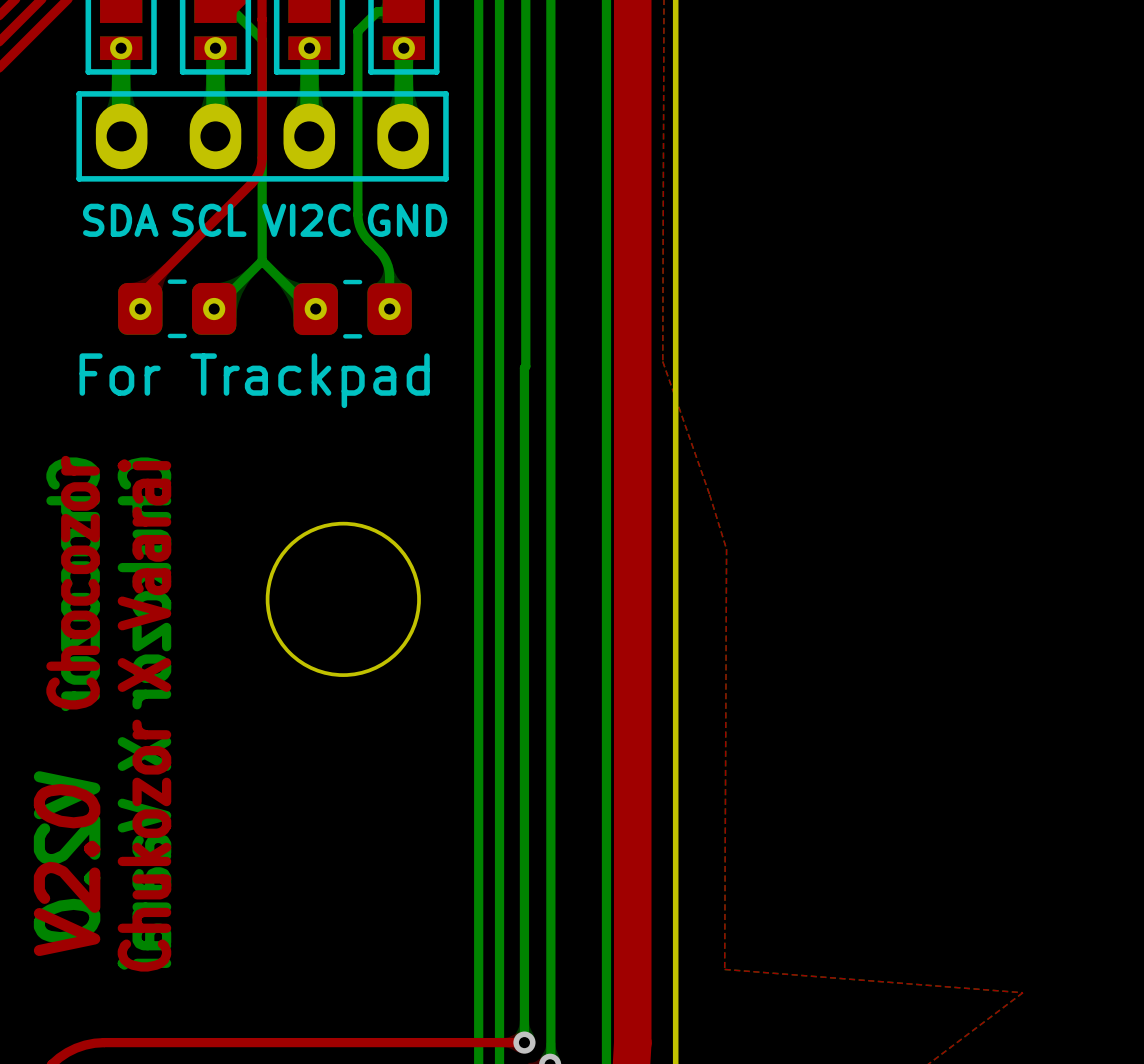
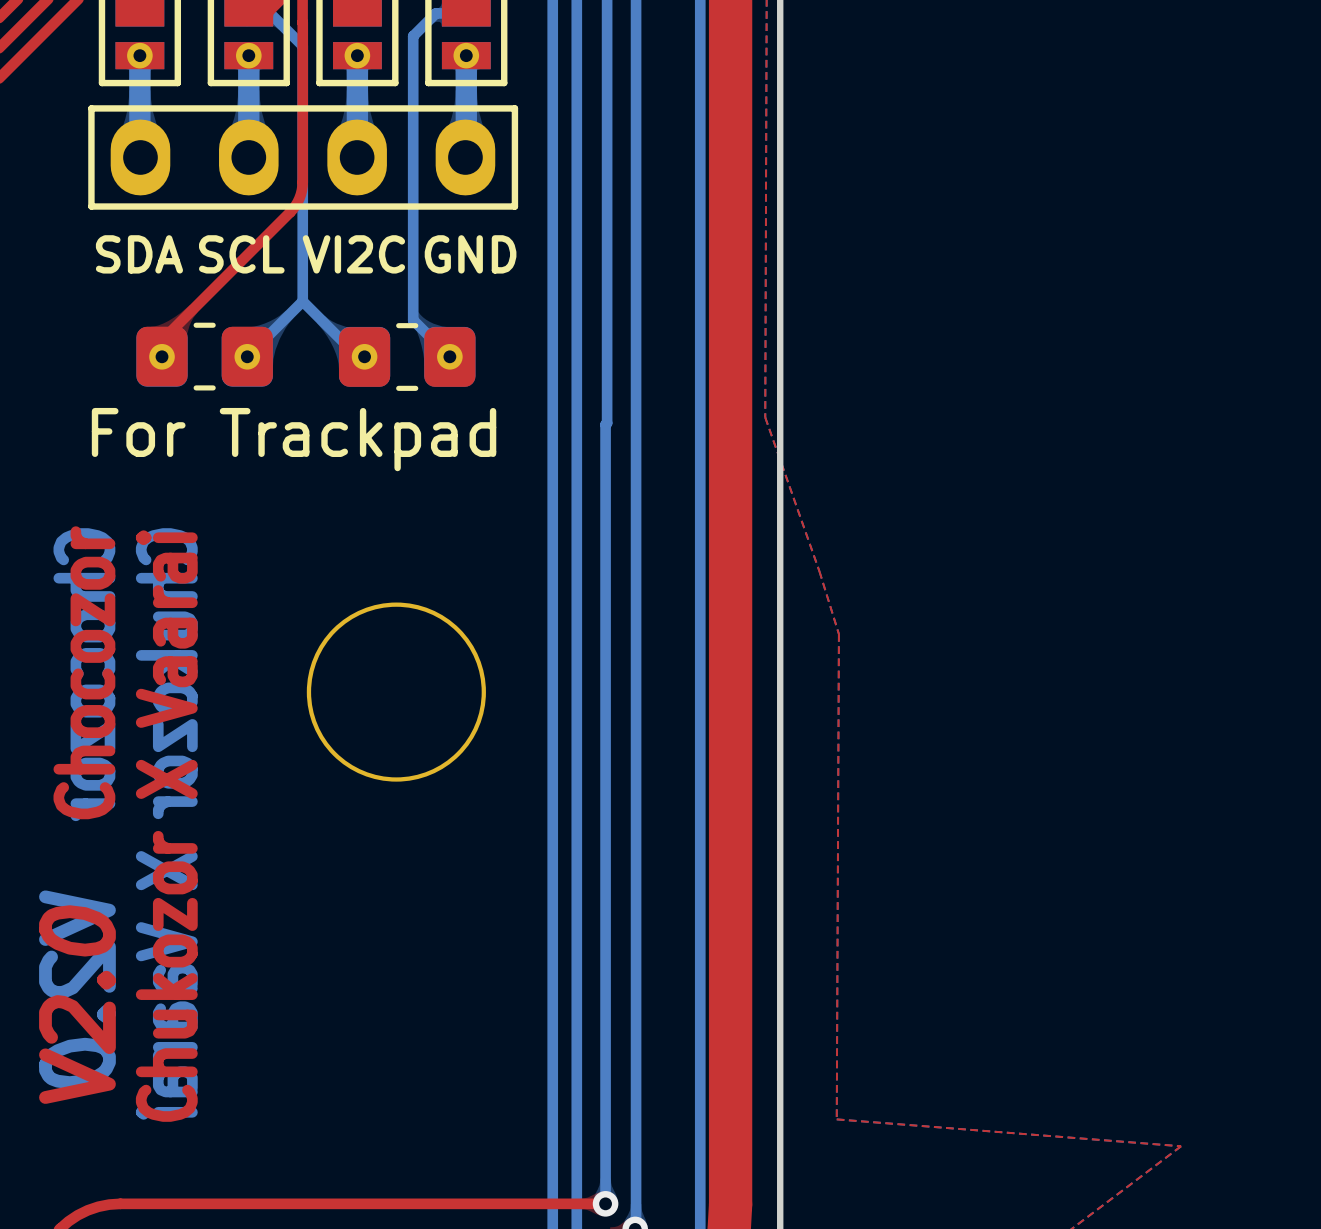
bottom track: (357, 214) (362, 231) (381, 253) (388, 266) (389, 309) -> (413, 247) (413, 320) (449, 356)

